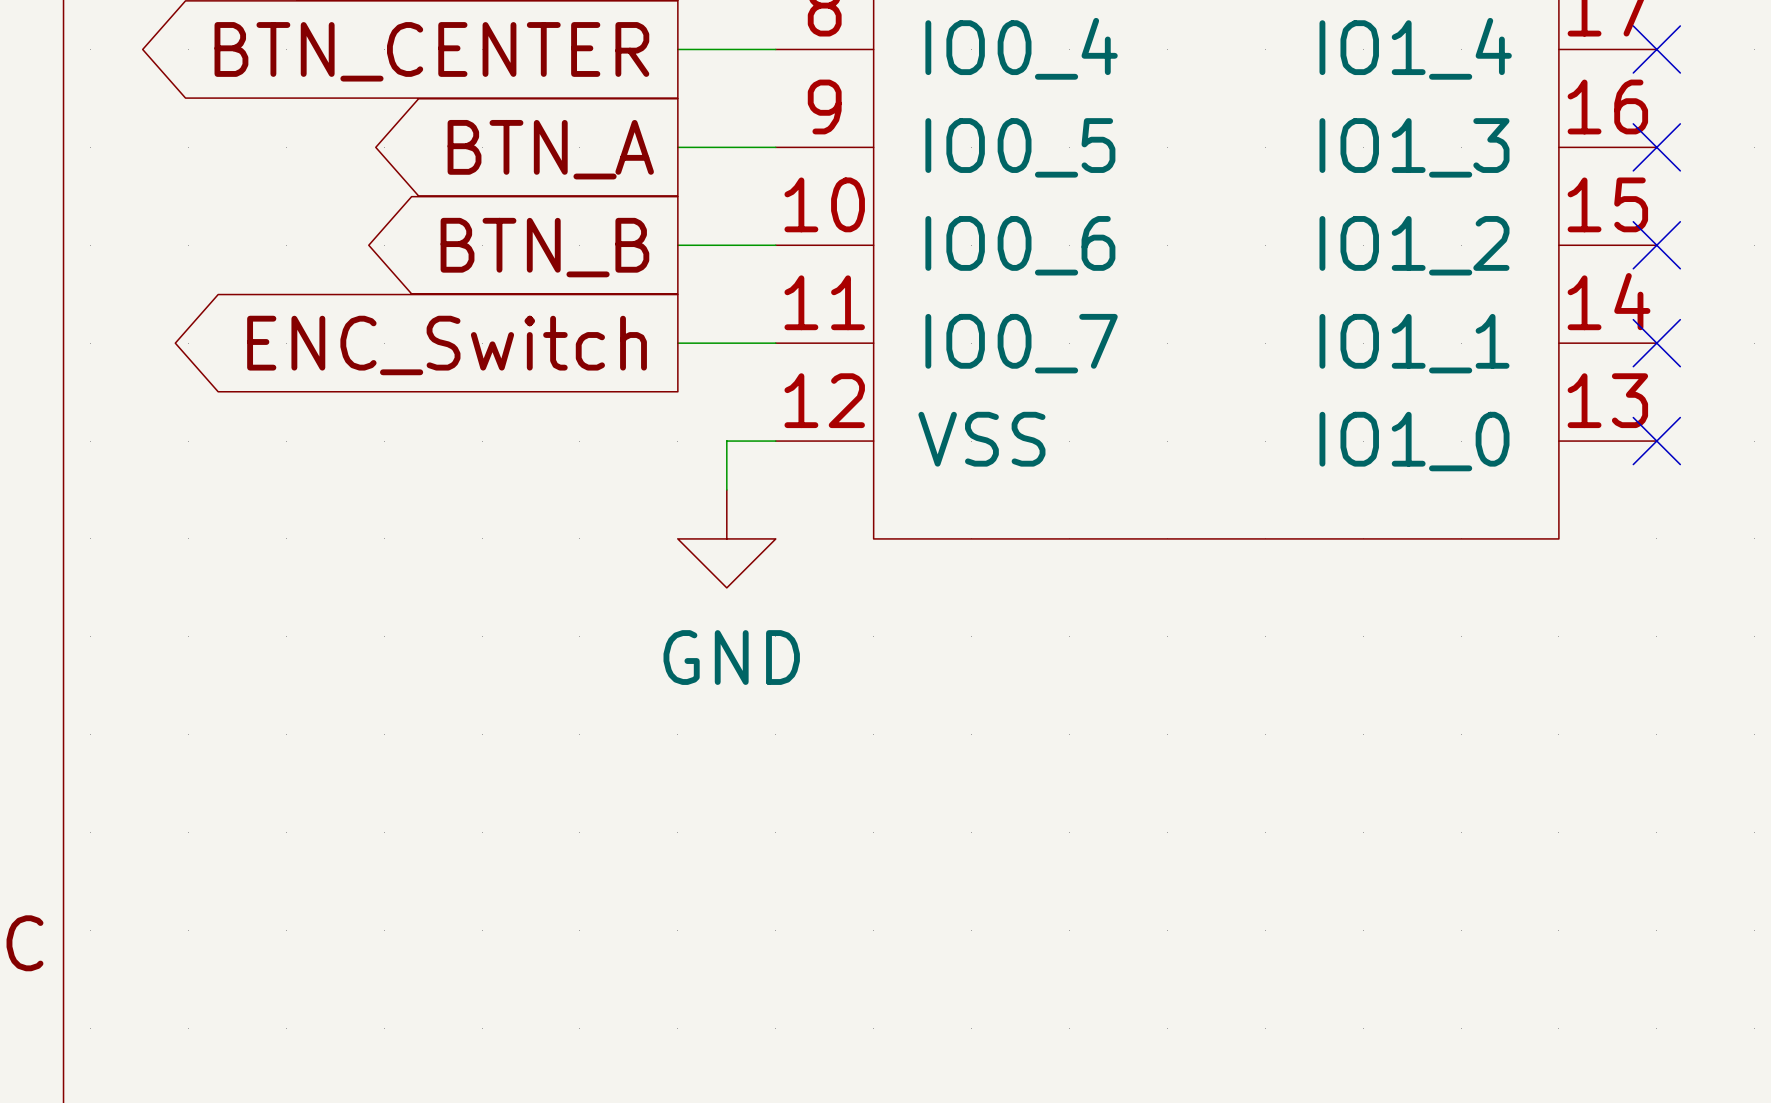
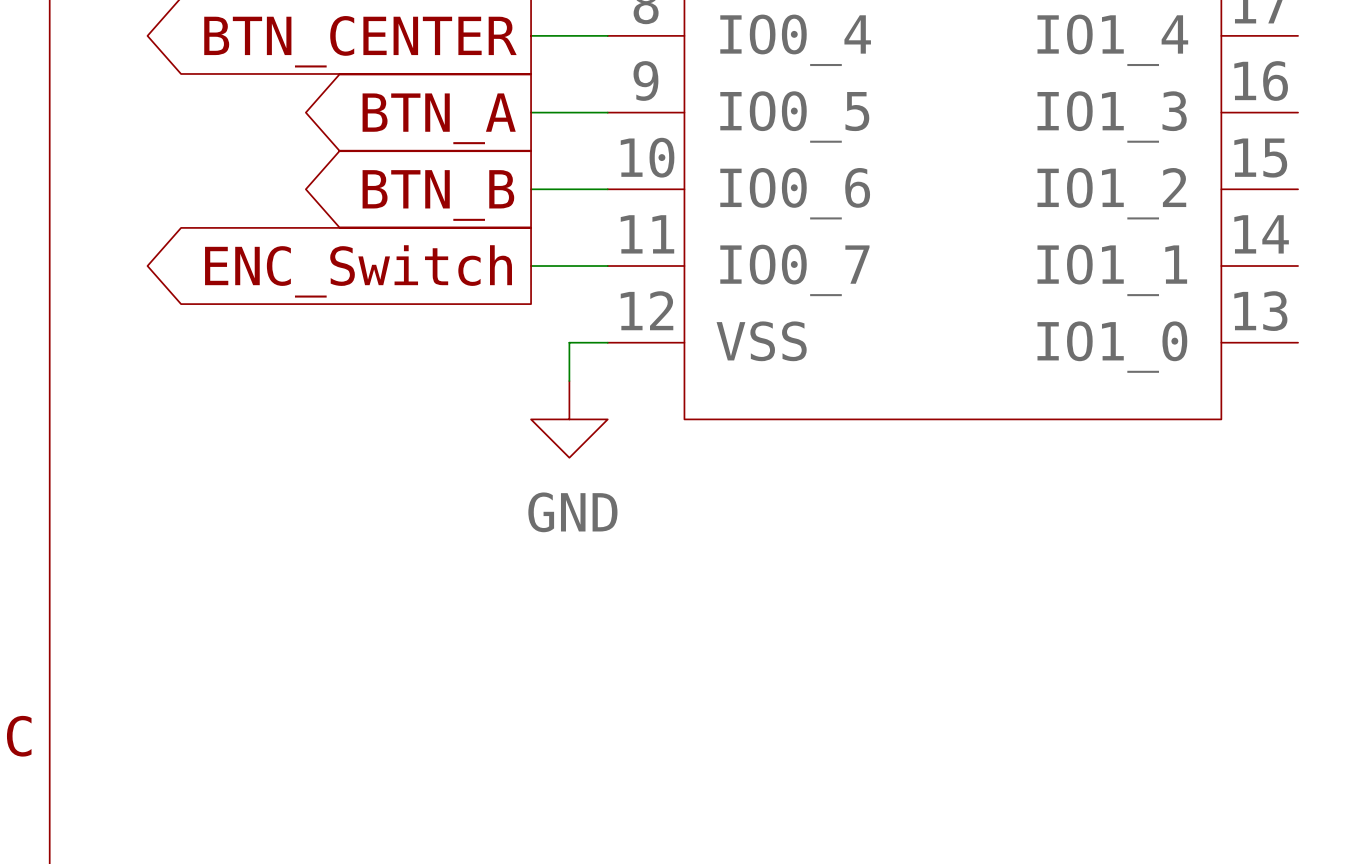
no-connect mark: (1656, 49) -> none
no-connect mark: (1656, 147) -> none
no-connect mark: (1656, 245) -> none
no-connect mark: (1656, 343) -> none
no-connect mark: (1656, 441) -> none

